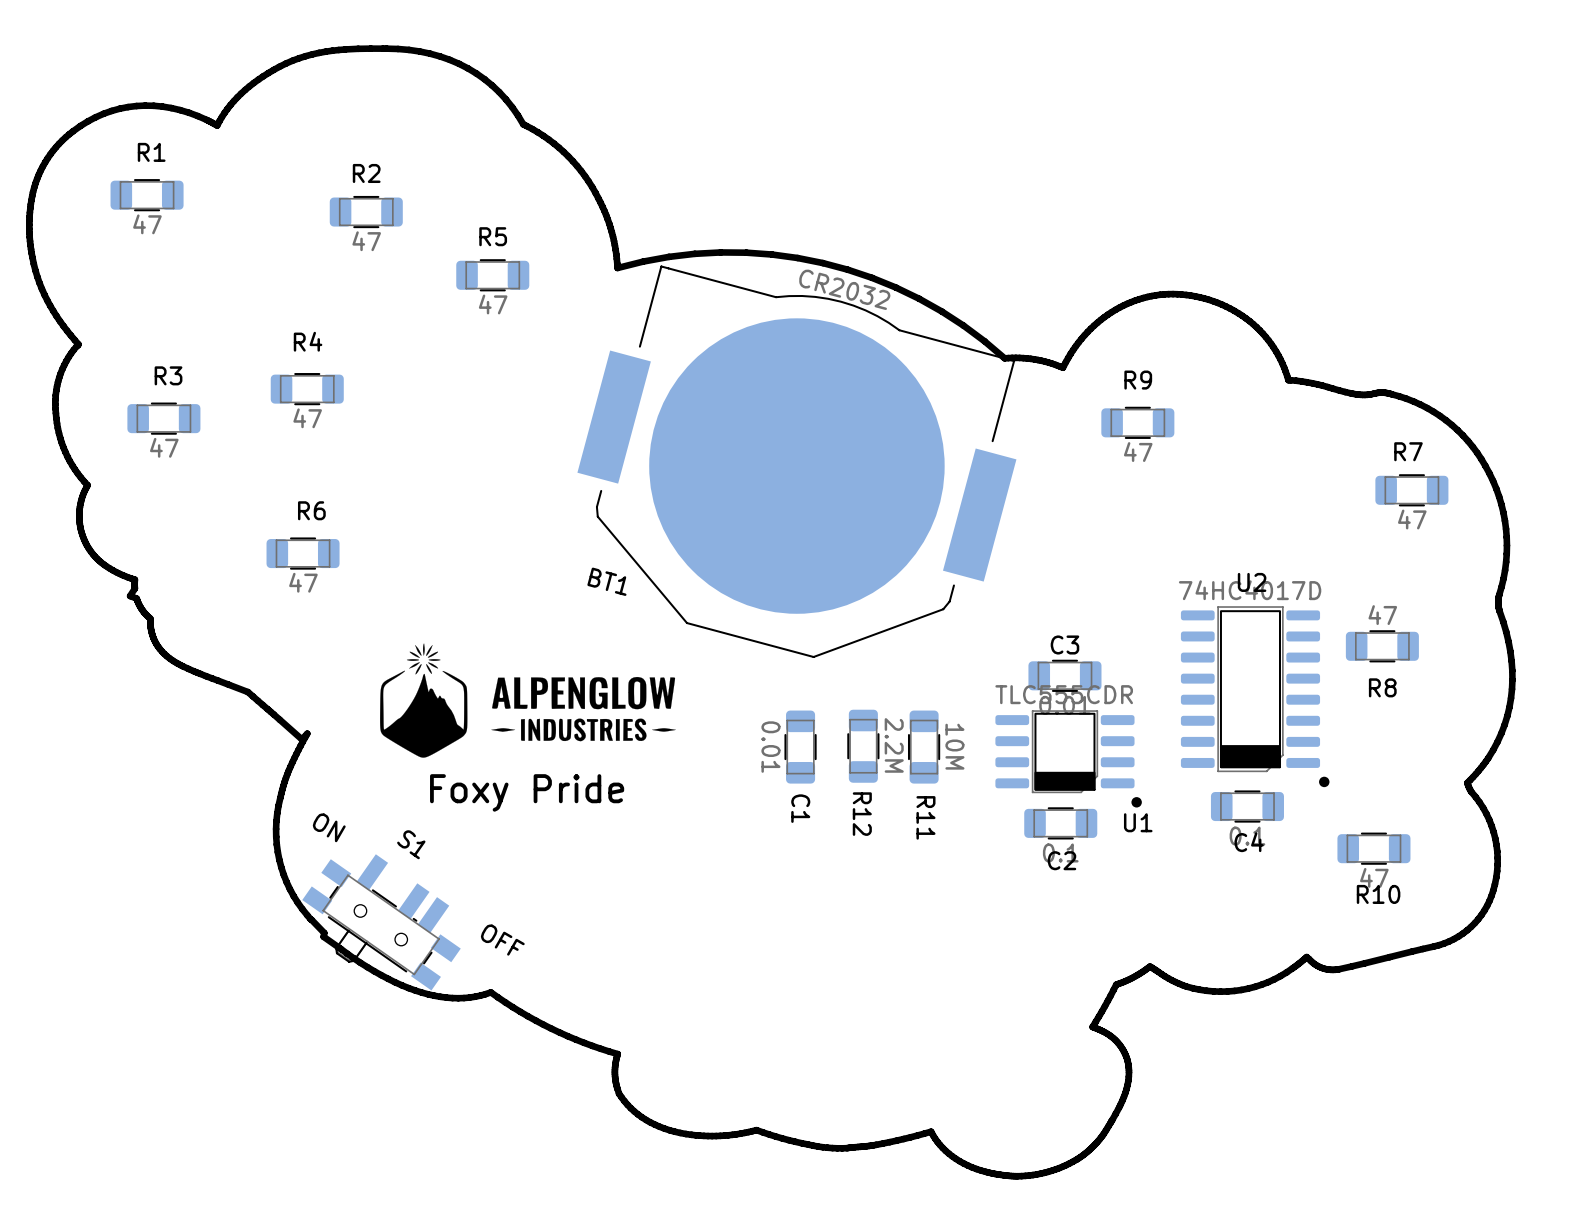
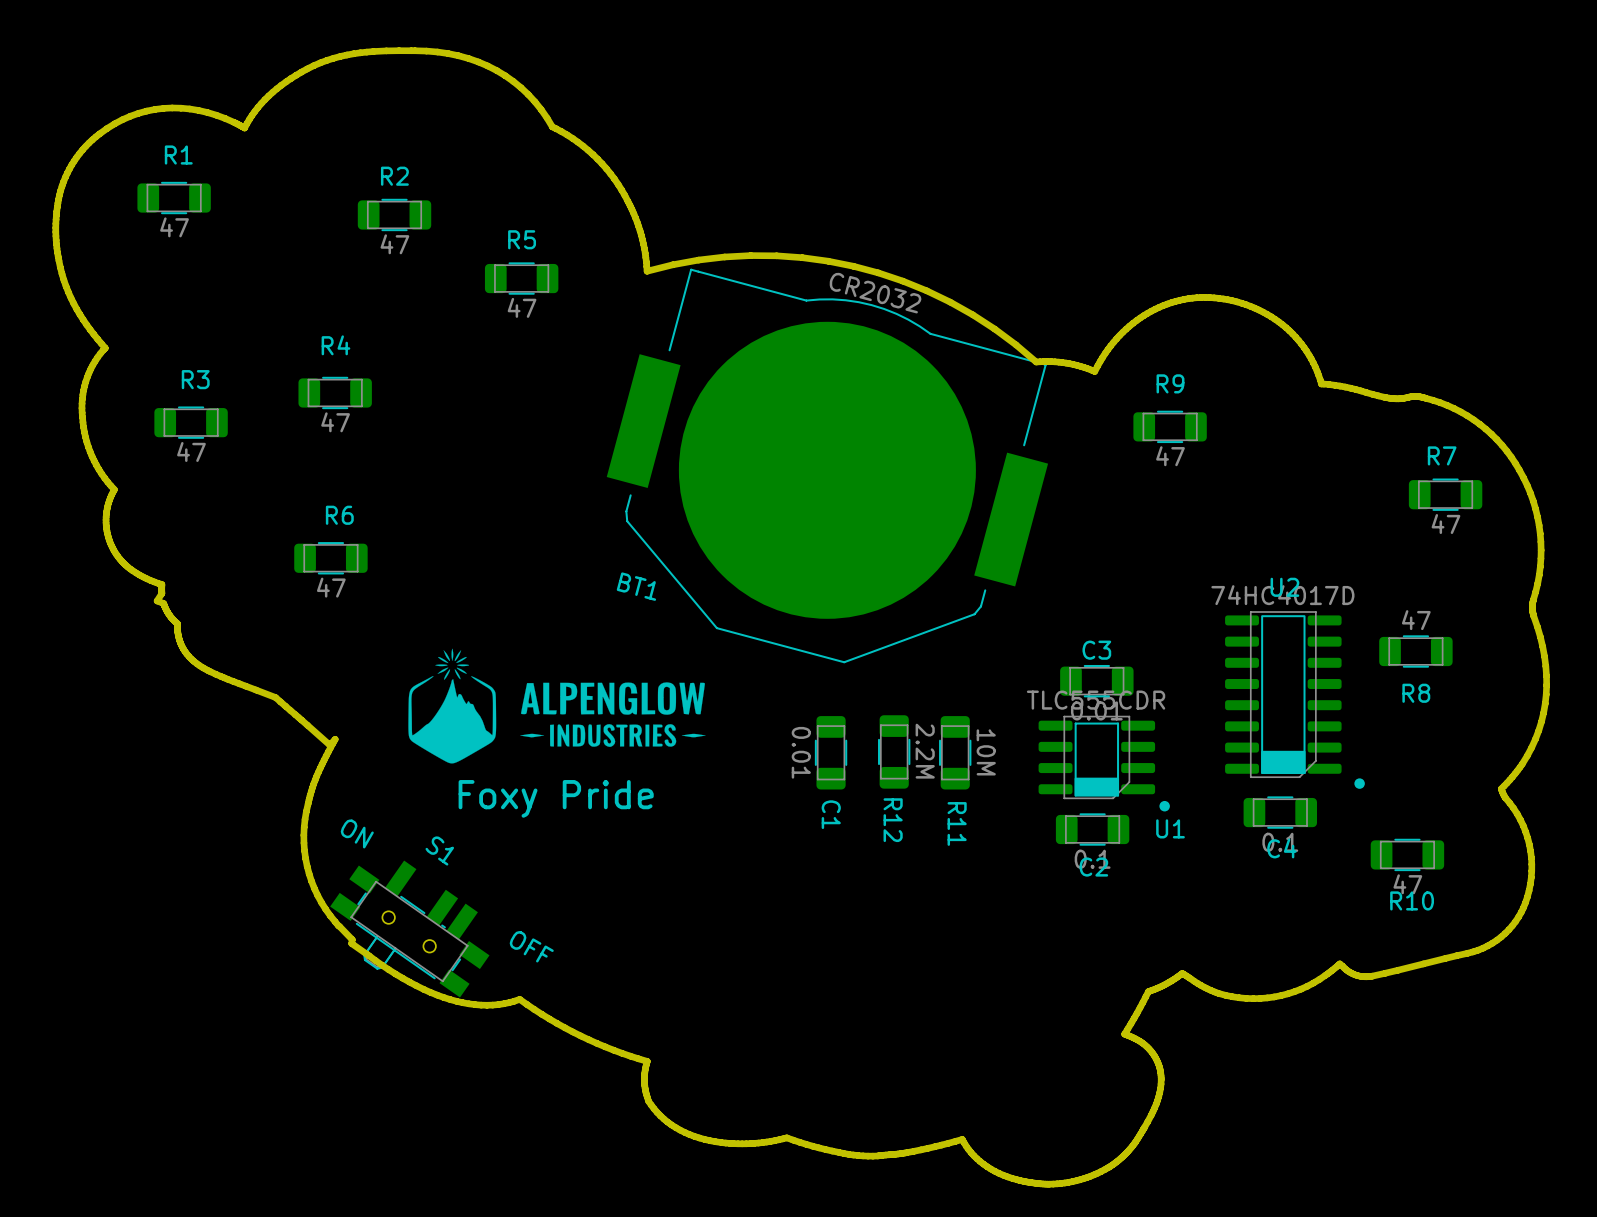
U2 footprint: [1180, 606, 1330, 788] -> [1225, 611, 1365, 789]
U1 footprint: [995, 710, 1142, 808] -> [1038, 715, 1170, 812]

